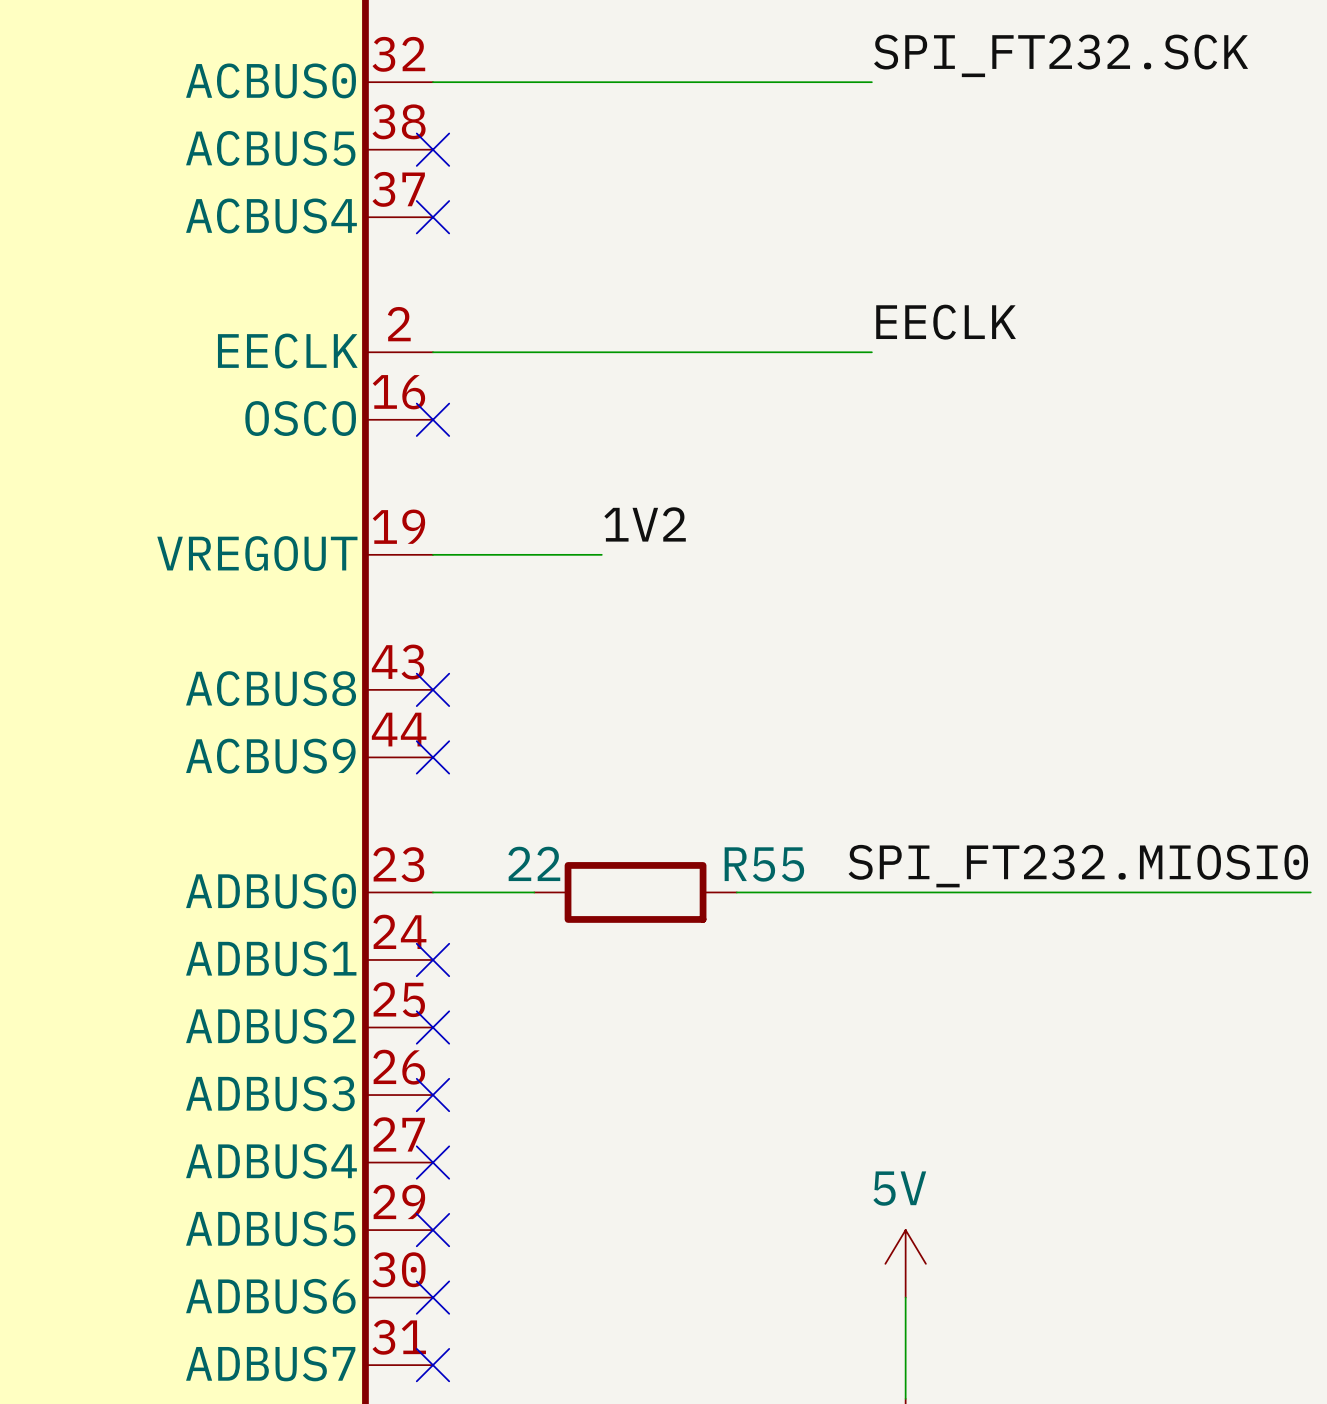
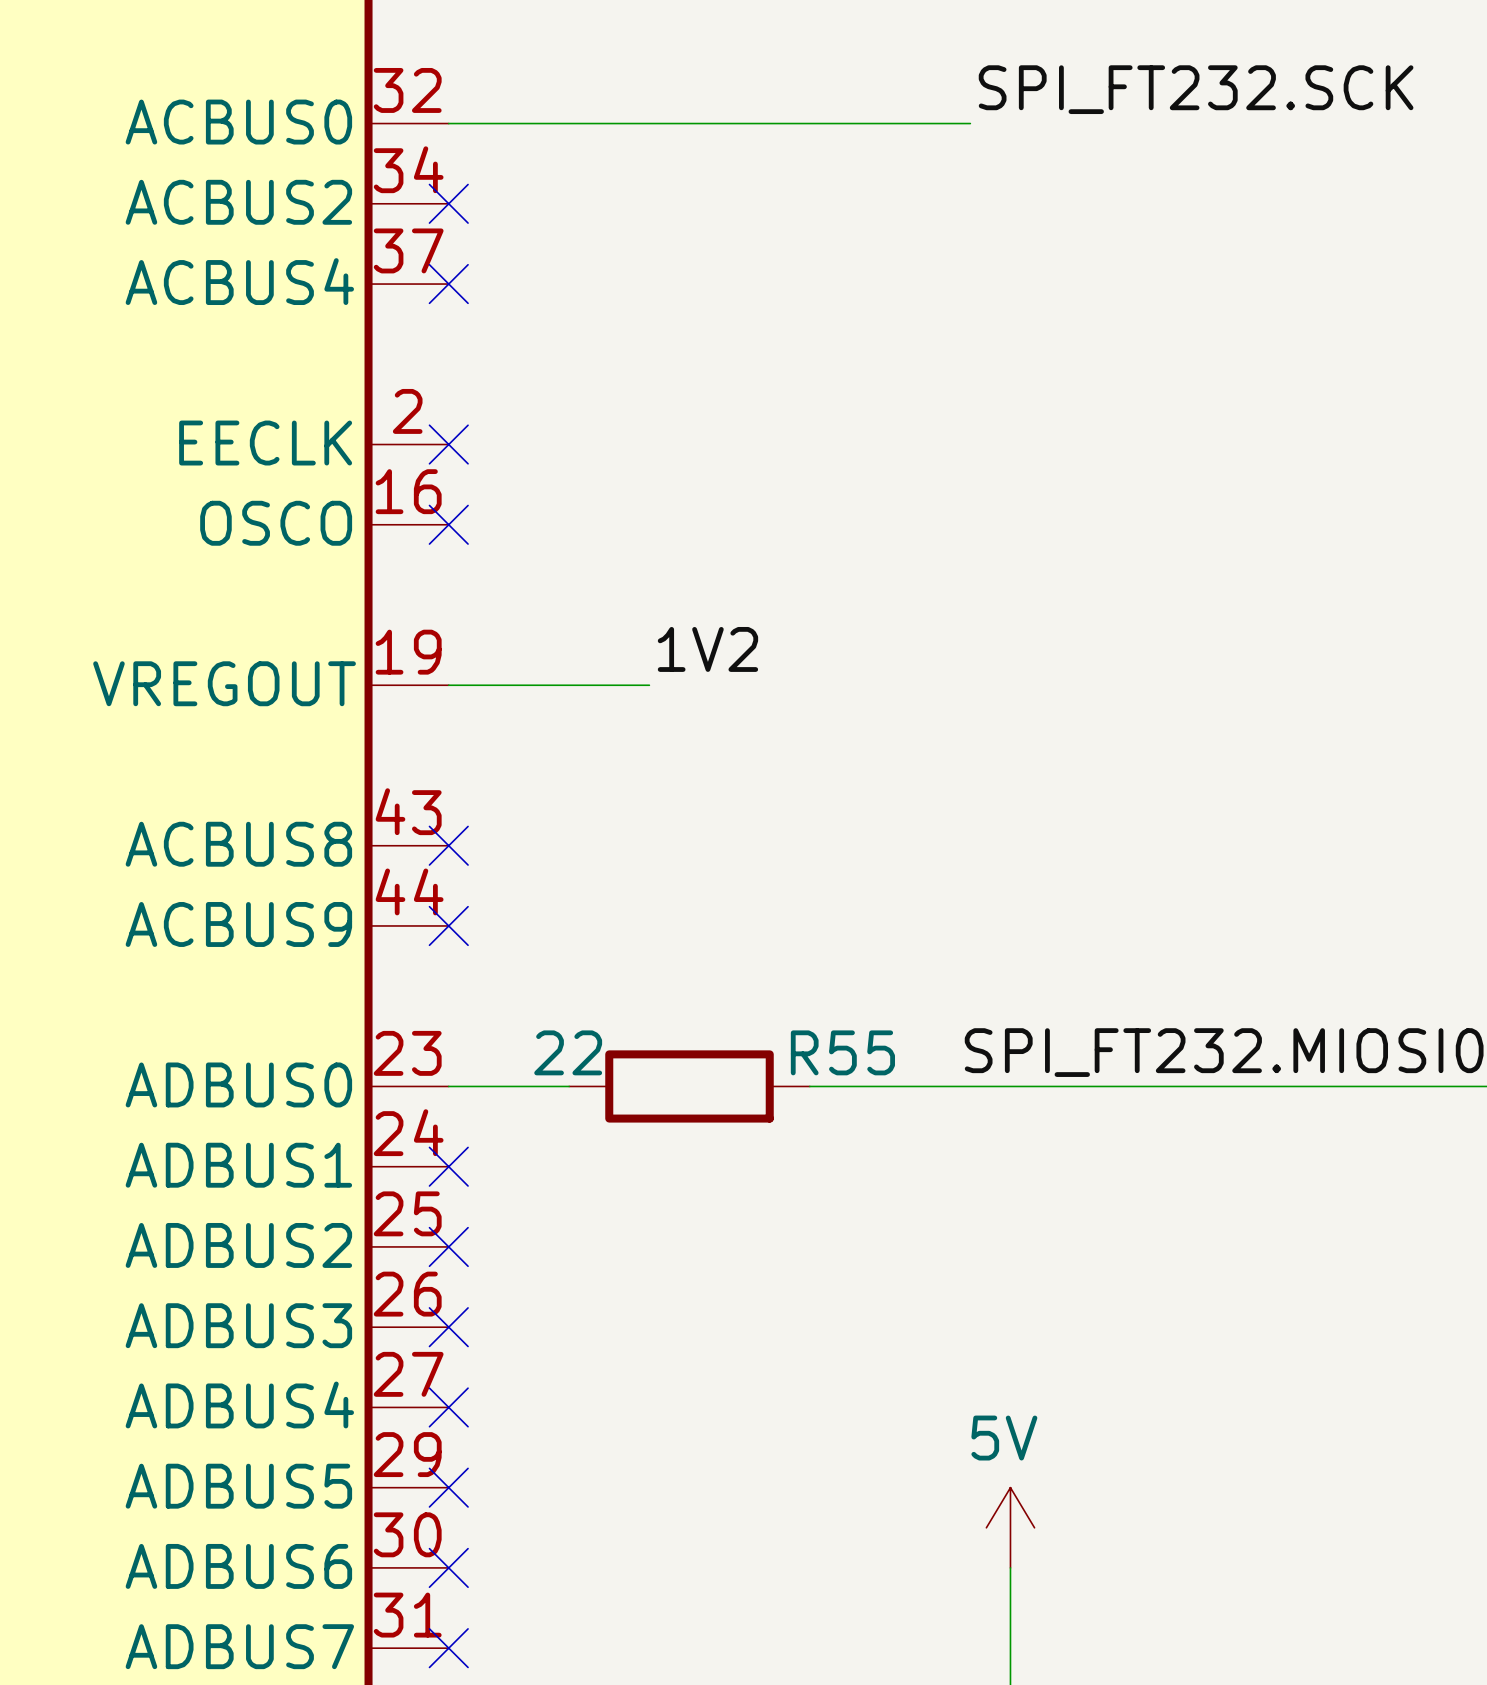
part pin number: 38 (399, 121) -> 34 (408, 169)
part pin name: ACBUS5 (270, 148) -> ACBUS2 (238, 202)
label: EECLK (946, 322) -> none
wire: (432, 352) (871, 352) -> none
no-connect mark: none -> (448, 444)

